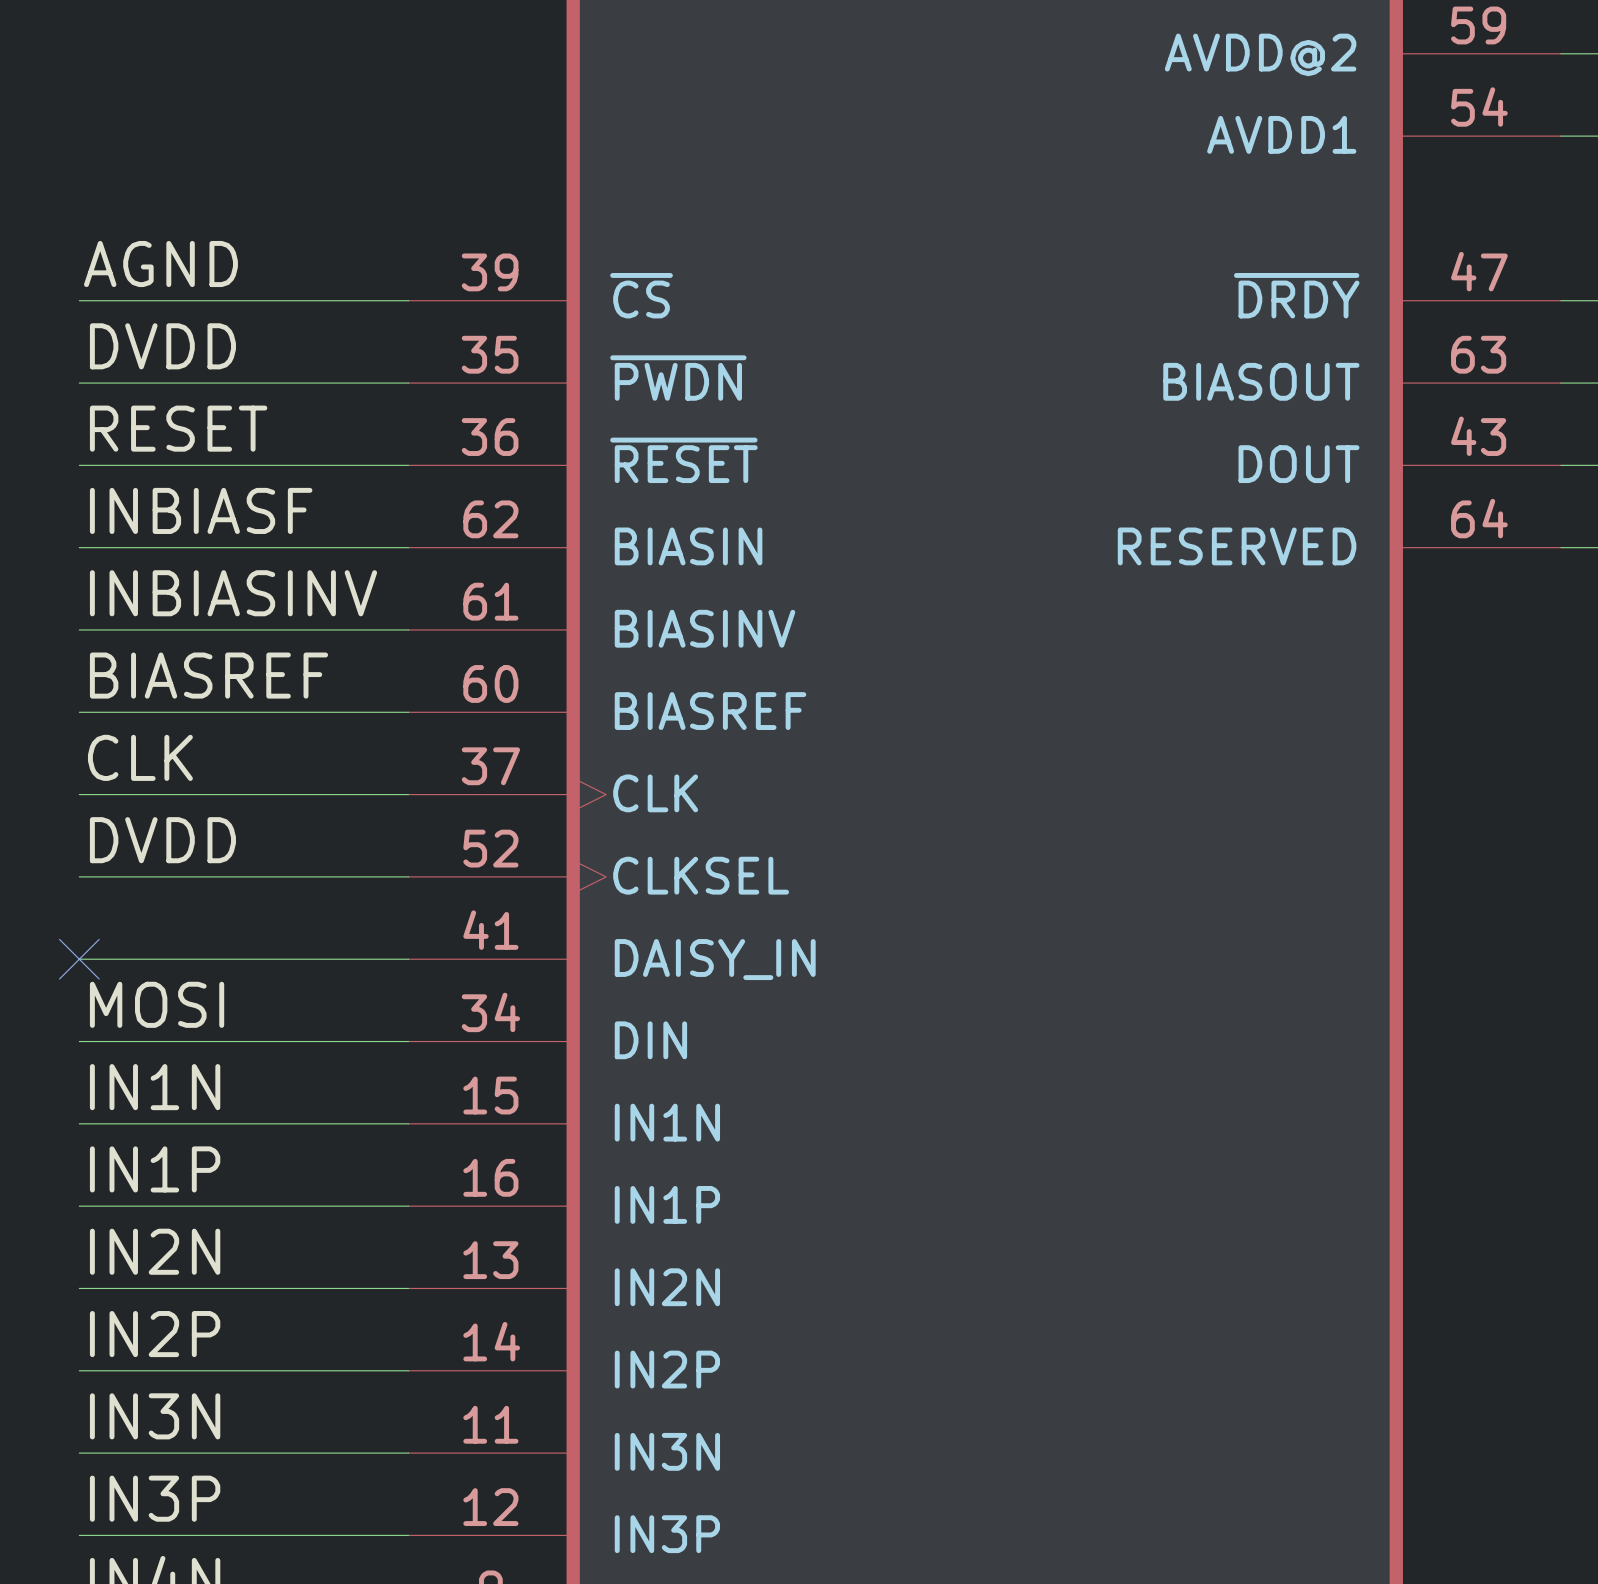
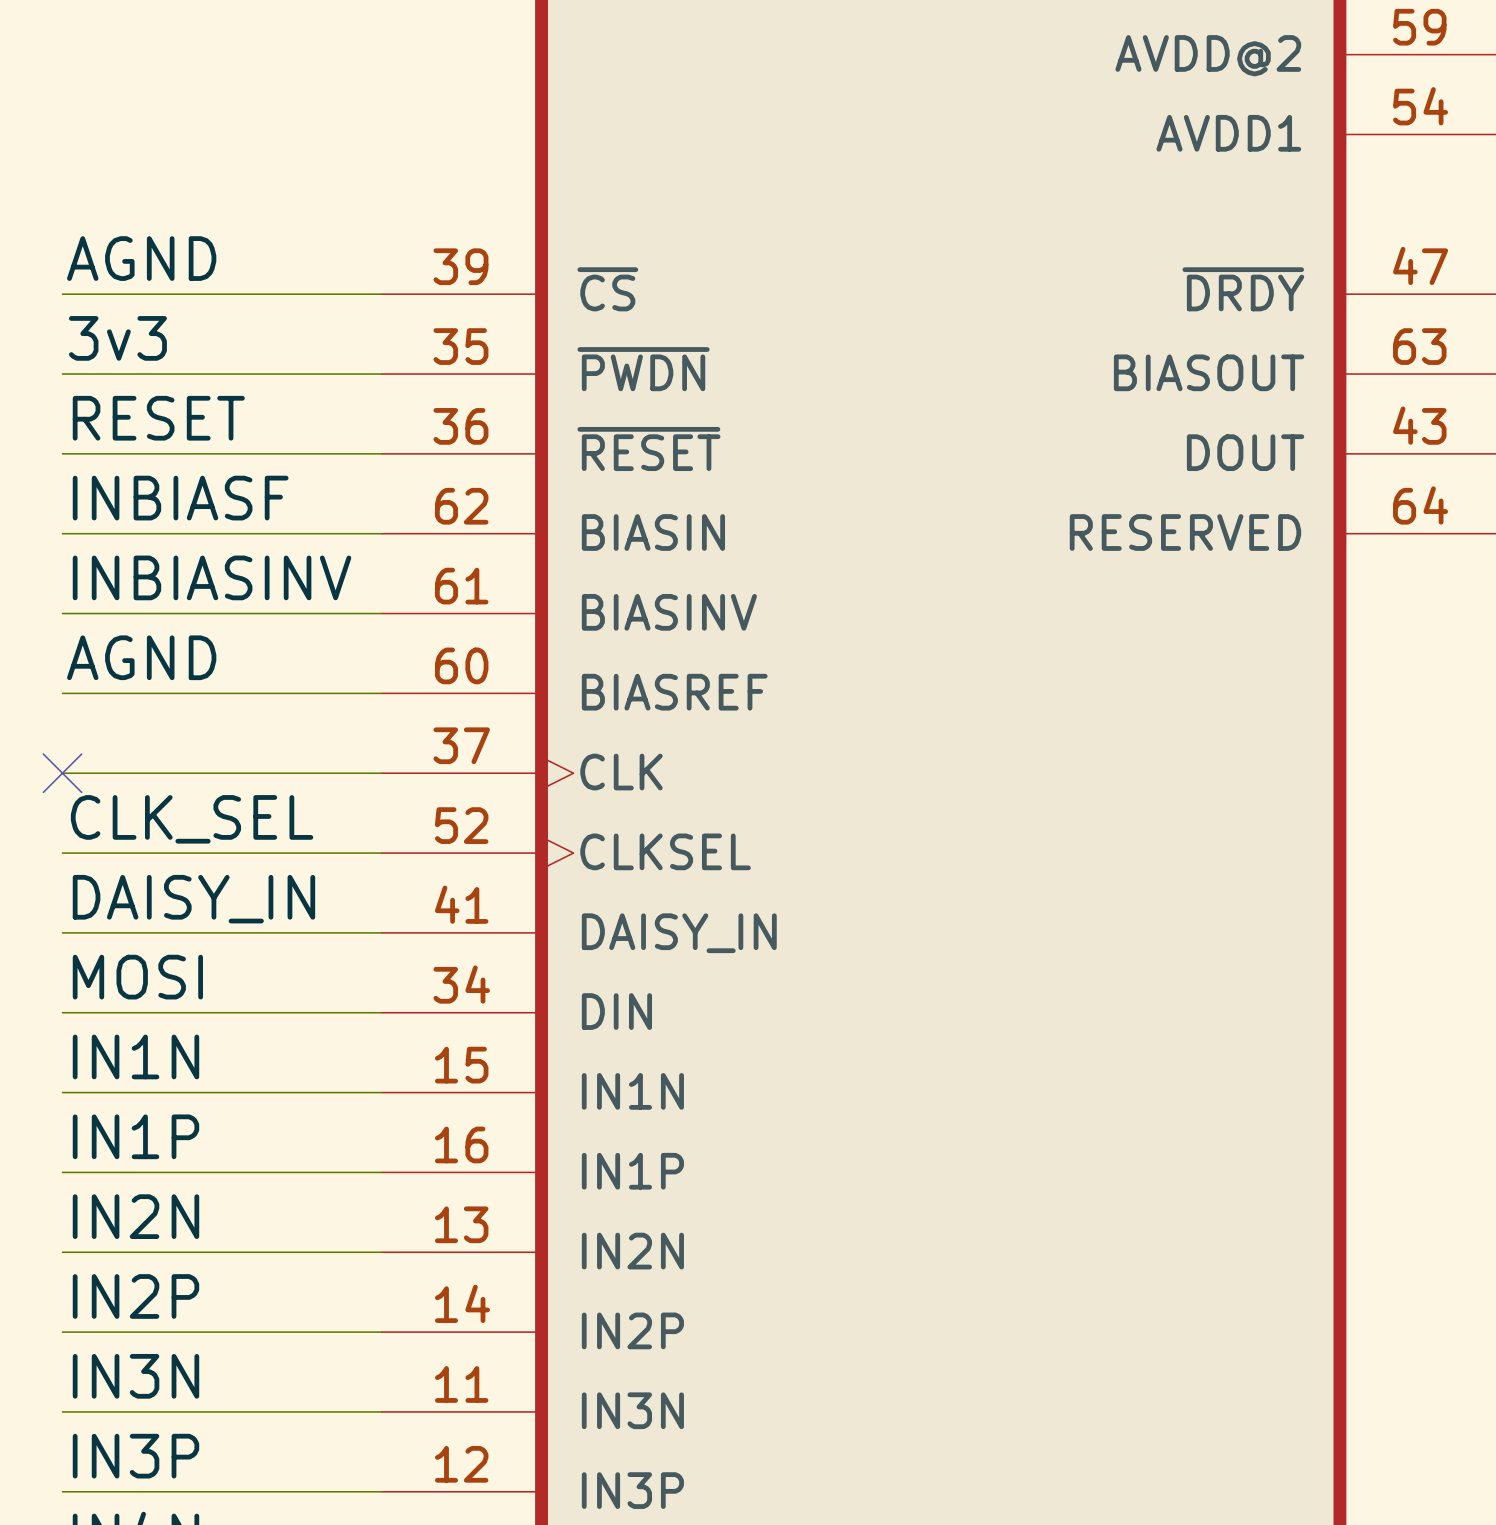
label: DVDD (162, 346) -> 3v3 (117, 338)
label: BIASREF (208, 675) -> AGND (141, 657)
label: CLK (140, 757) -> none
label: DVDD (162, 840) -> CLK_SEL (192, 819)
label: none -> DAISY_IN (193, 899)
no-connect mark position: (79, 959) -> (62, 773)

